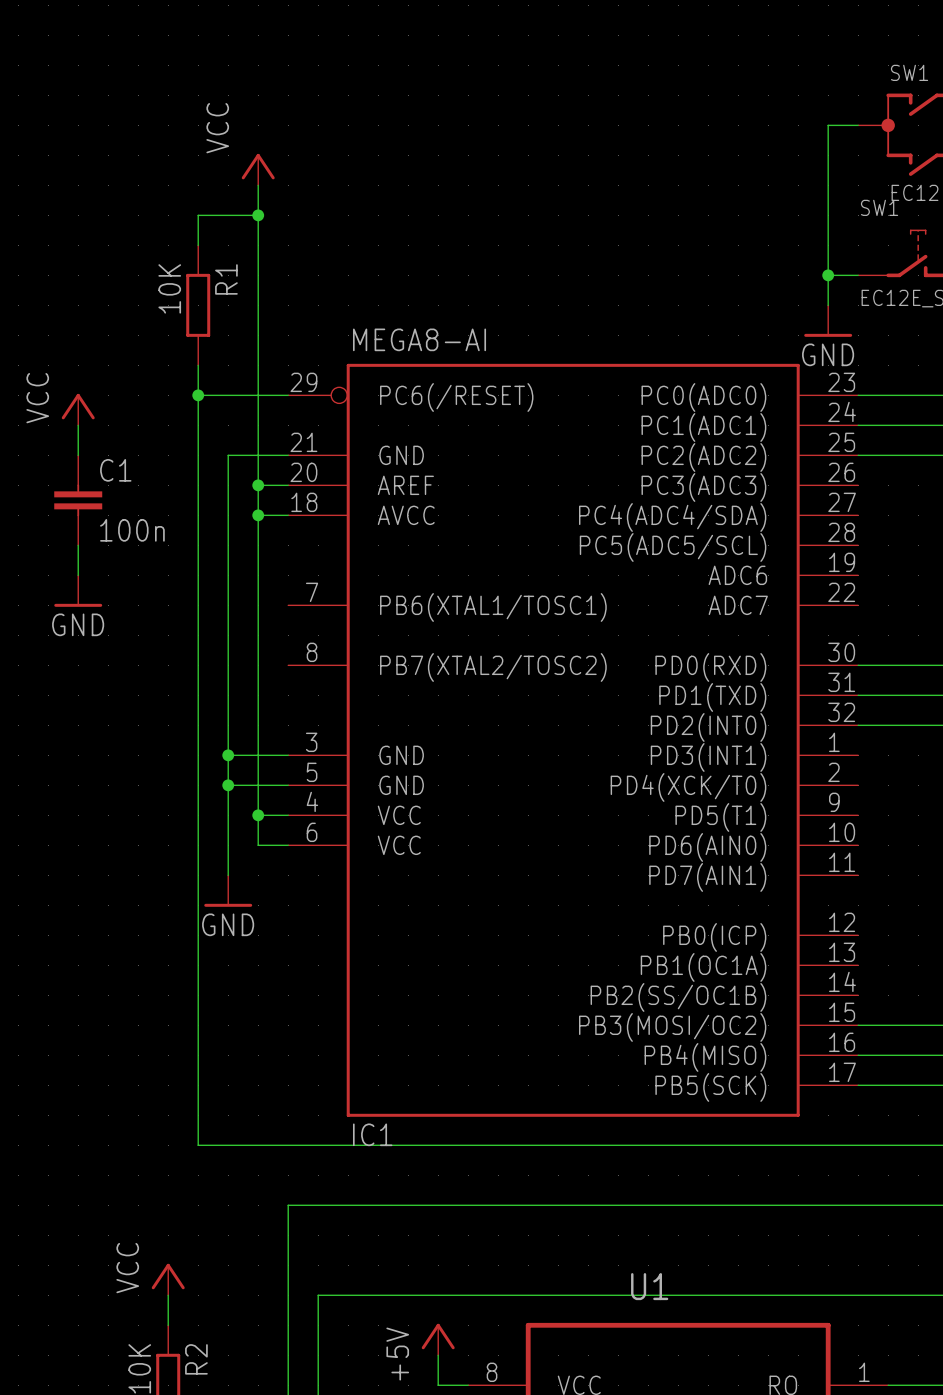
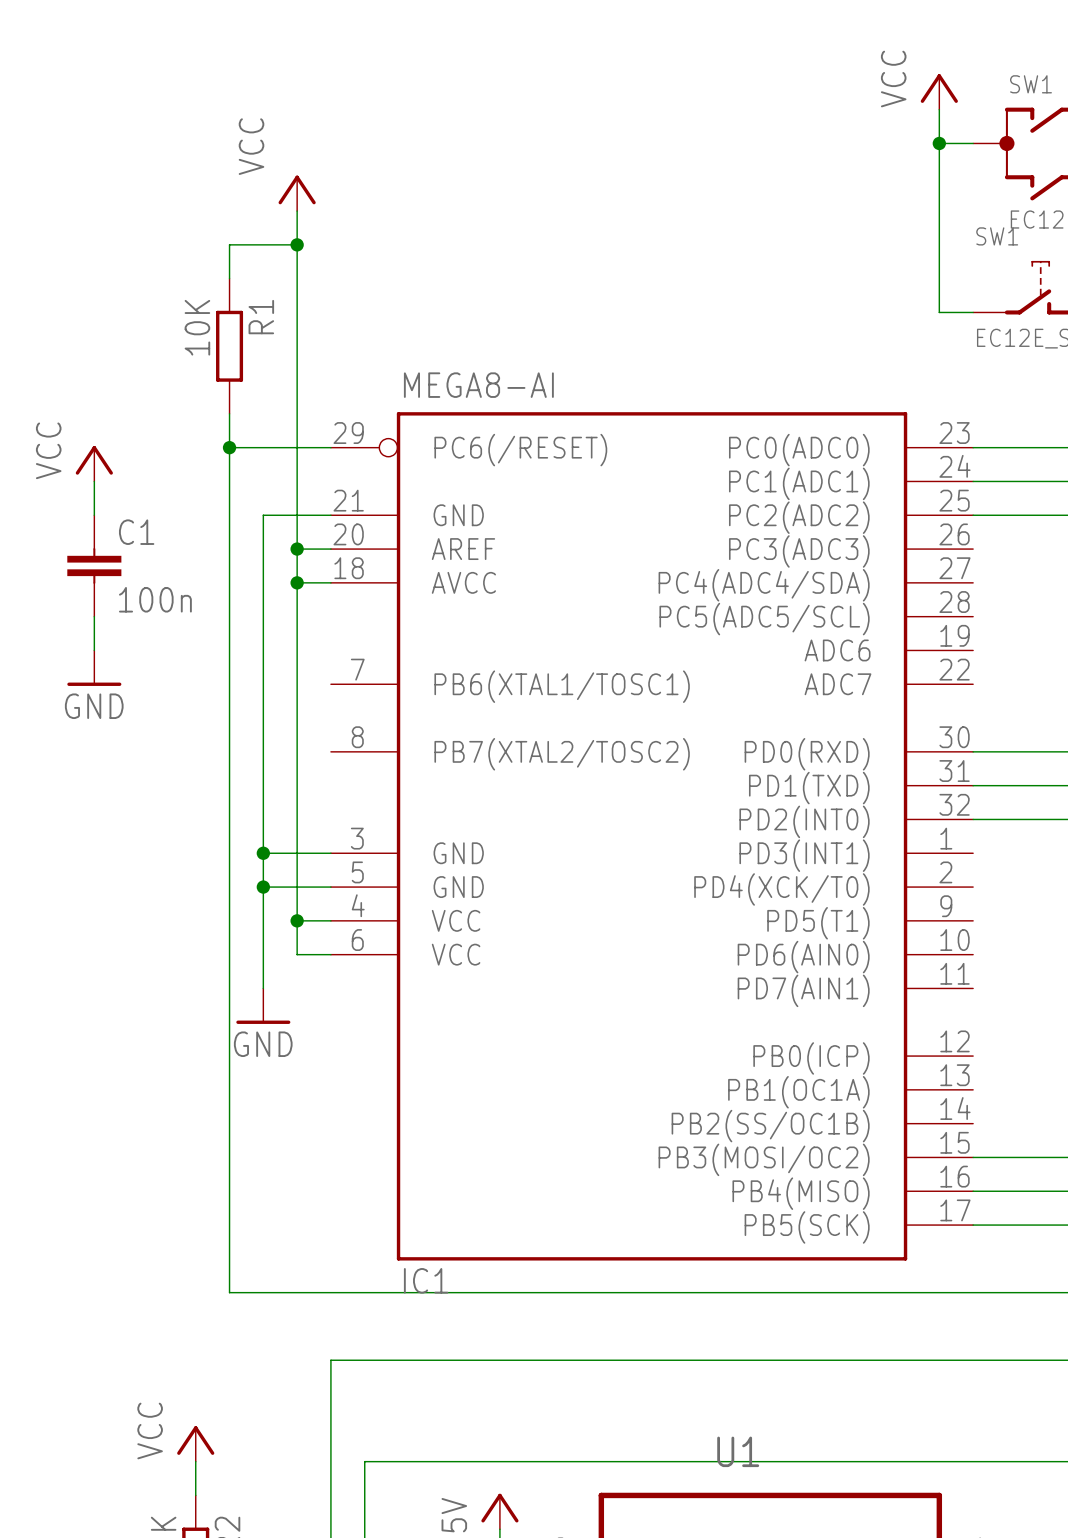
power symbol: none -> VCC (939, 91)
junction: none -> (939, 143)
wire: (828, 275) (828, 305) -> (939, 109) (939, 143)
junction: (828, 275) -> none
power symbol: GND (828, 321) -> none

